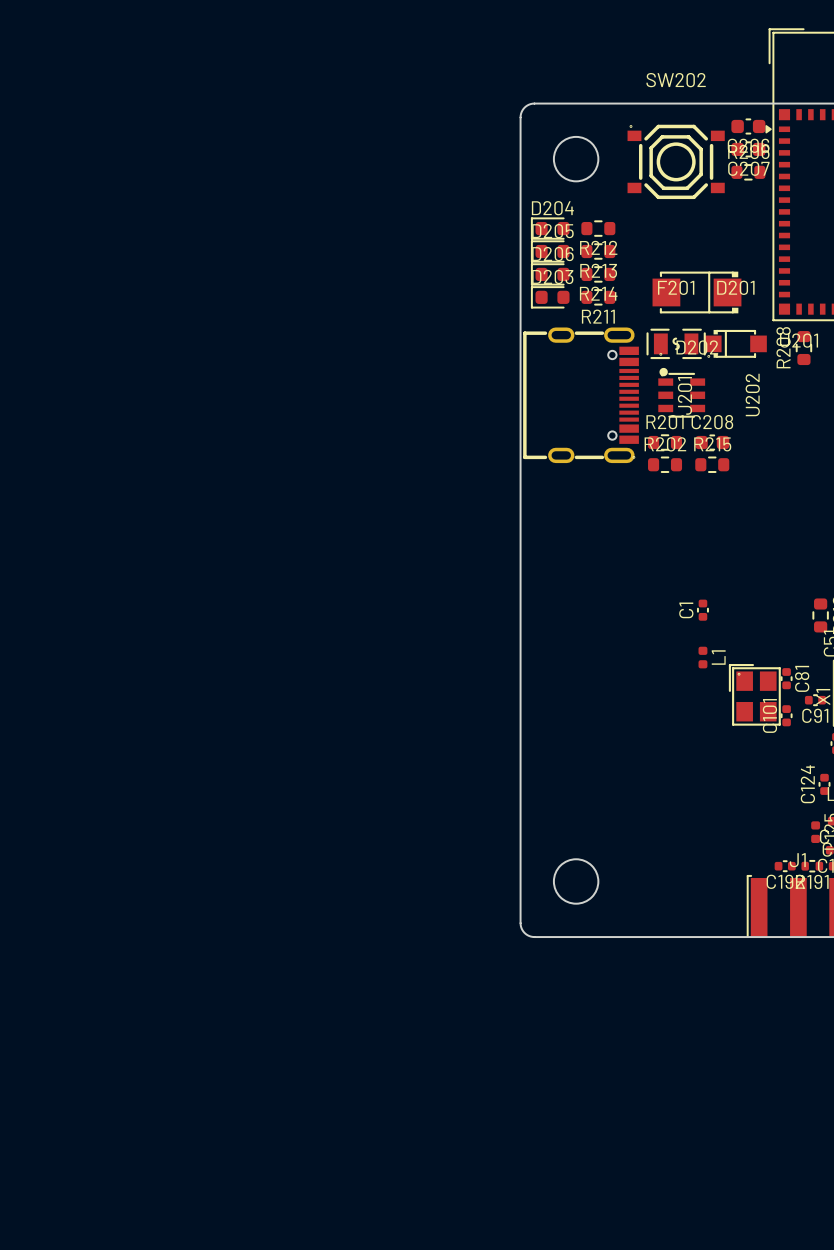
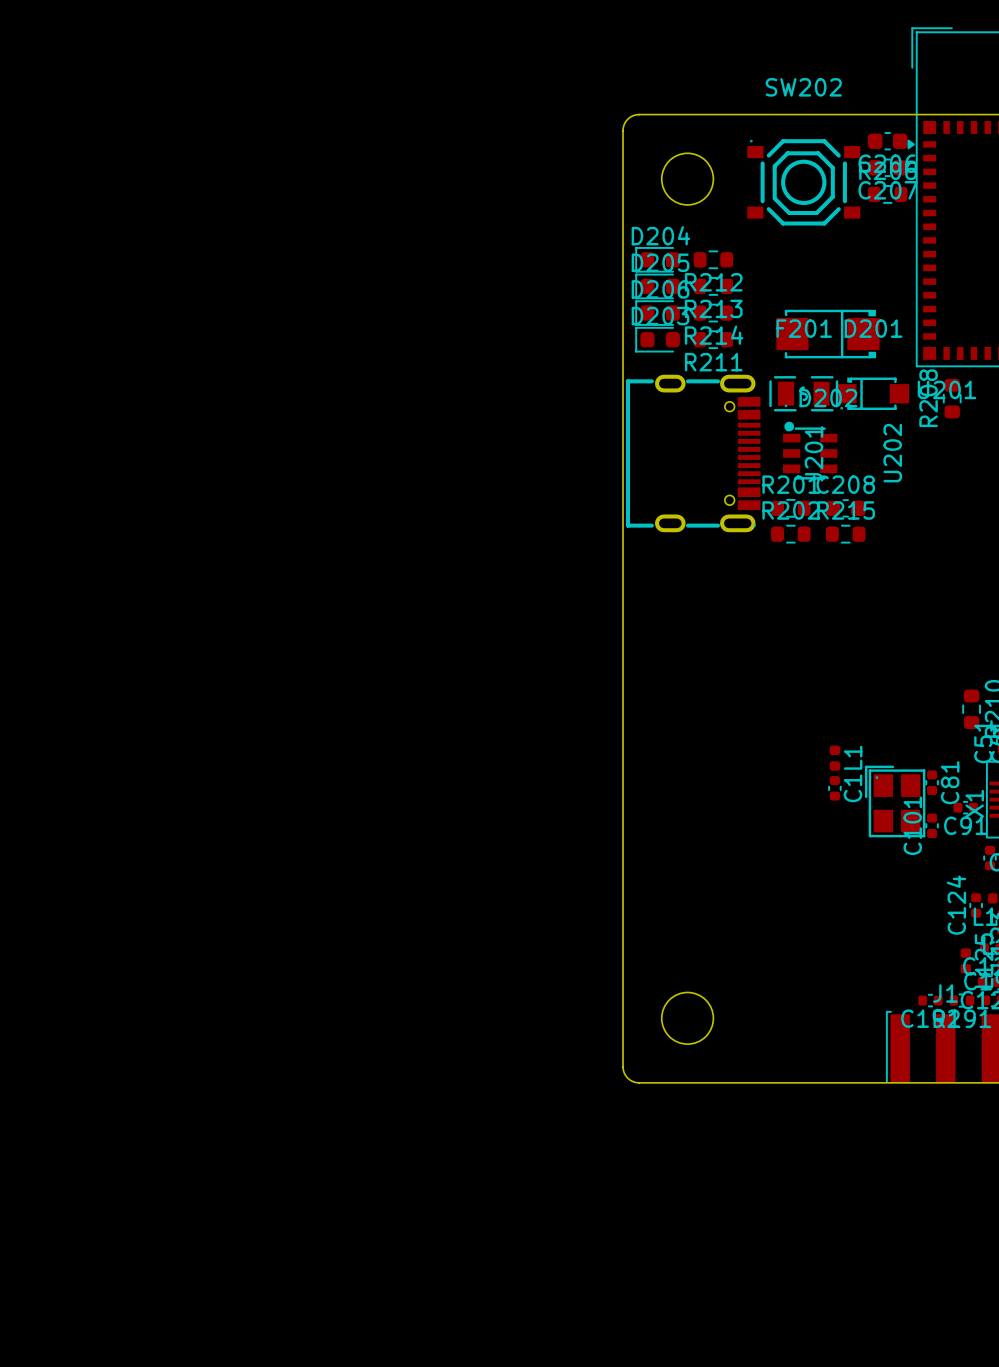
C1 name position: C1 (686, 610) -> C1 (853, 788)
C1 position: (702, 610) -> (834, 788)

